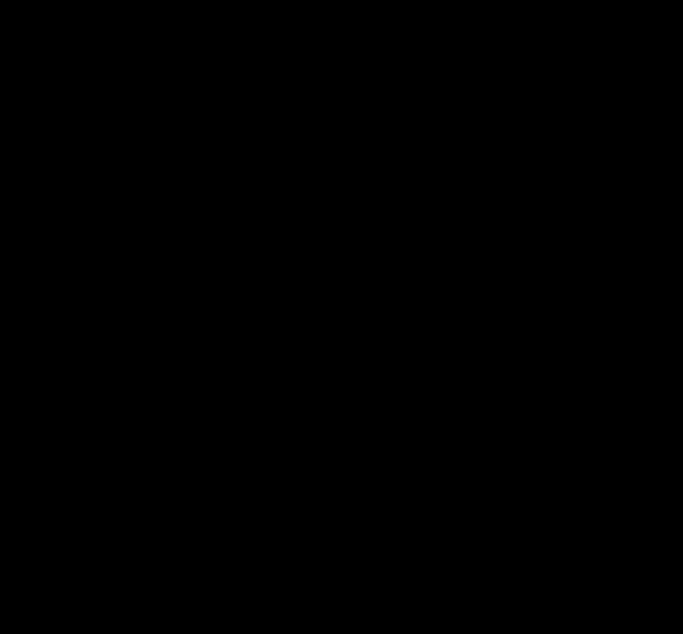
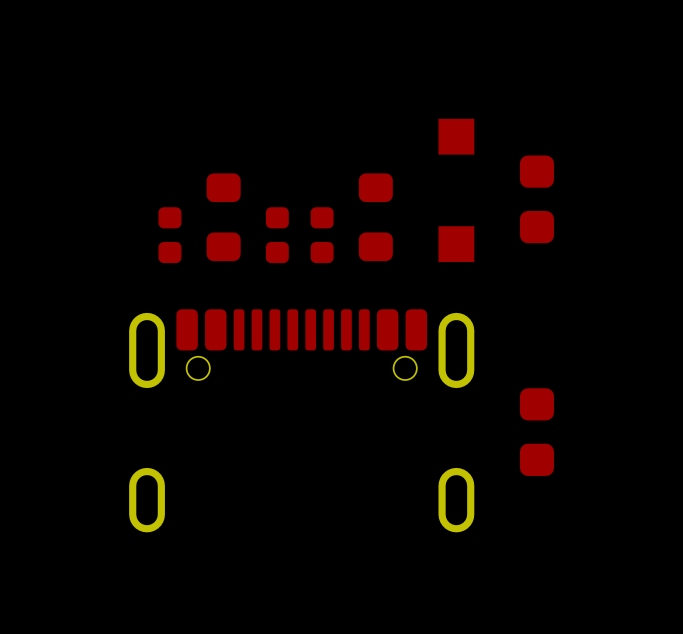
part: none -> (456, 190)
part: none -> (536, 199)
part: none -> (223, 217)
part: none -> (375, 217)
part: none -> (169, 235)
part: none -> (277, 235)
part: none -> (322, 235)
part: none -> (301, 420)
part: none -> (536, 432)

